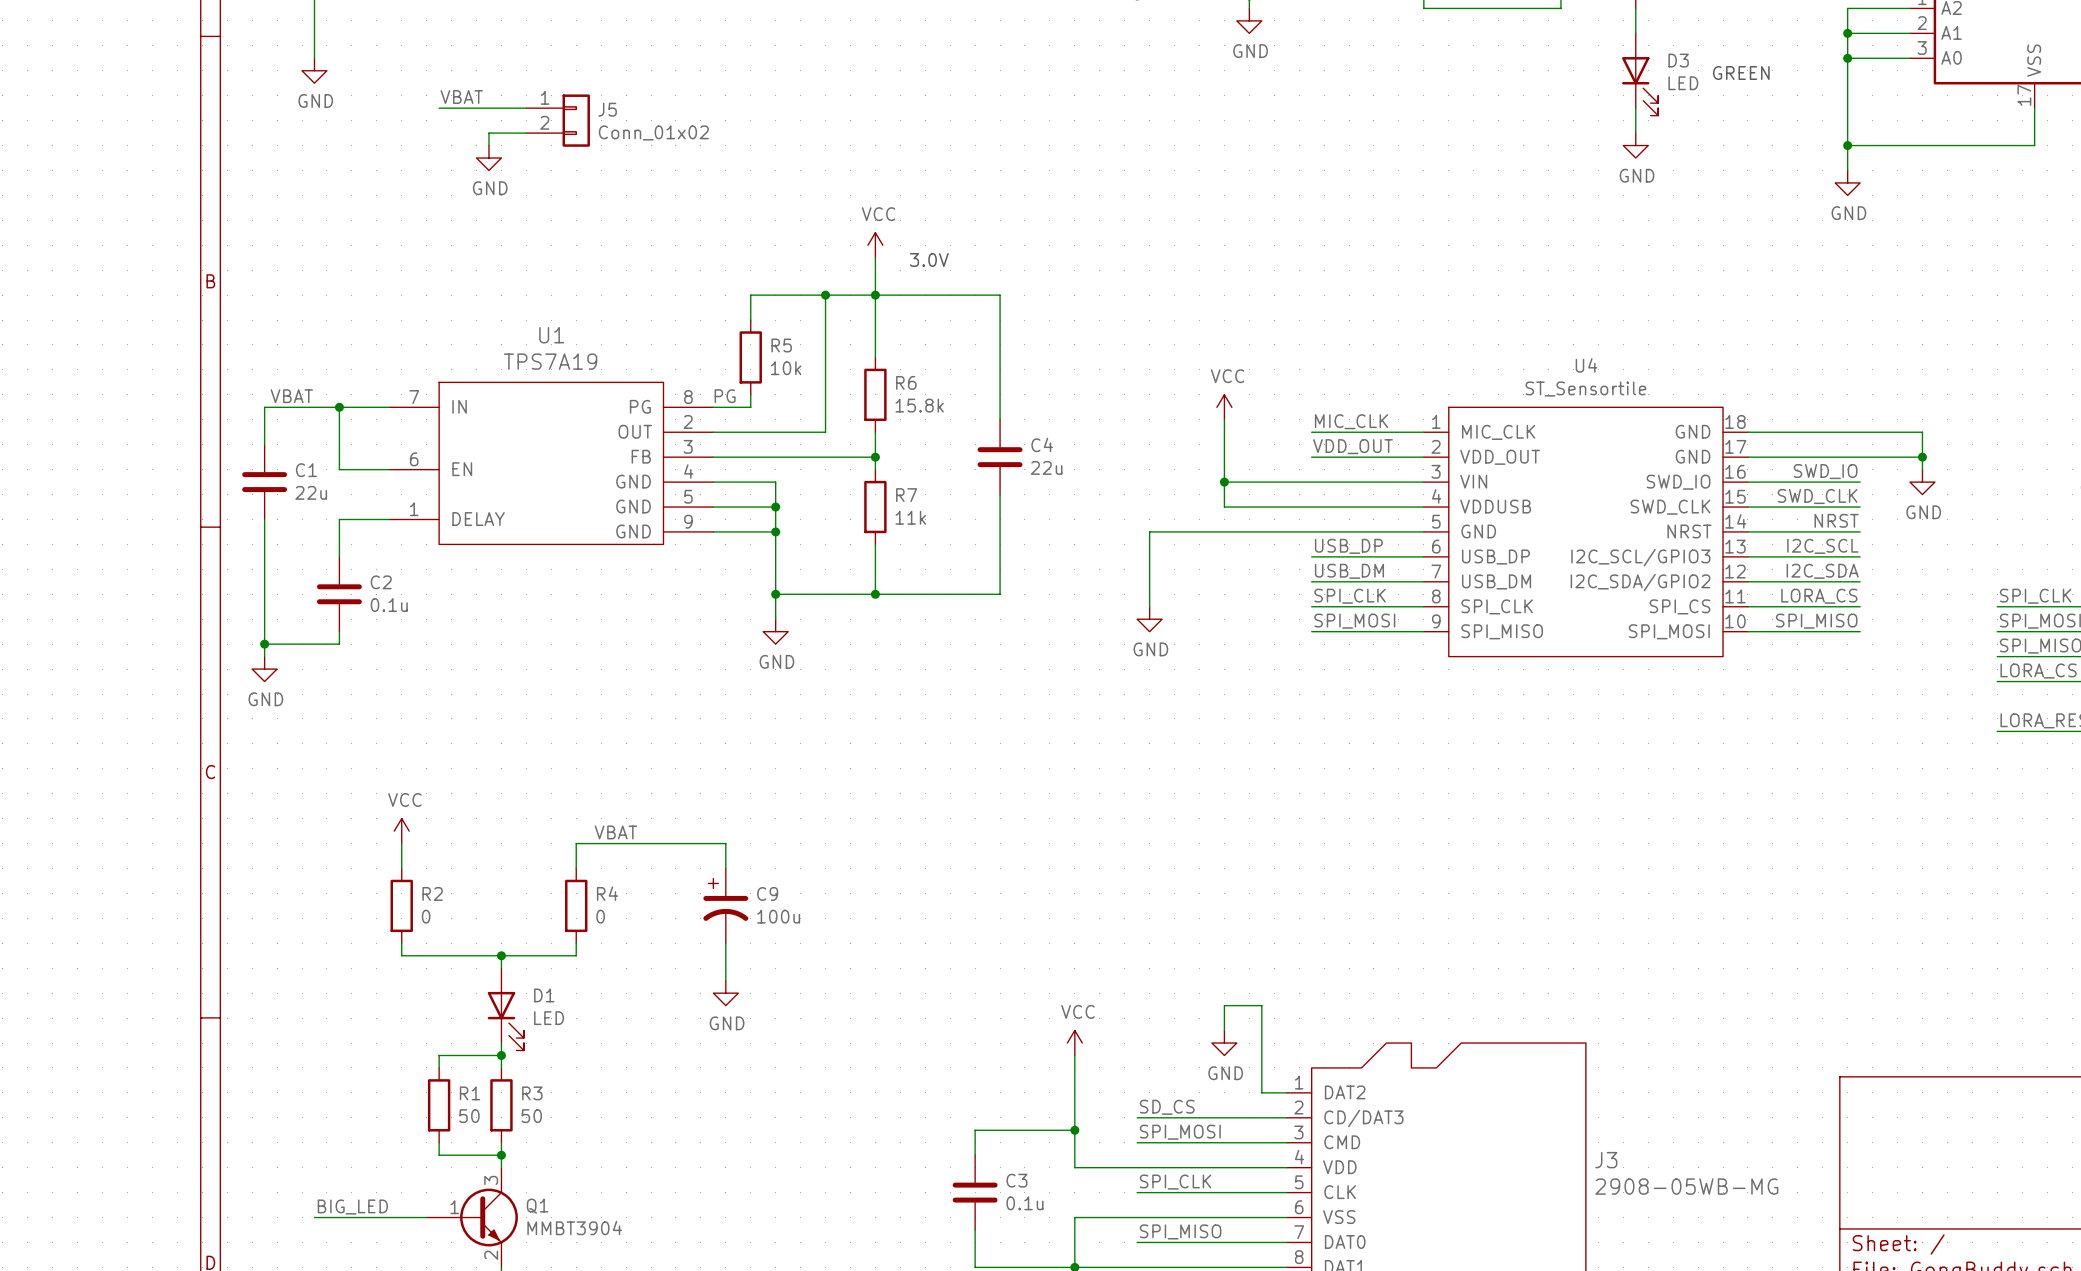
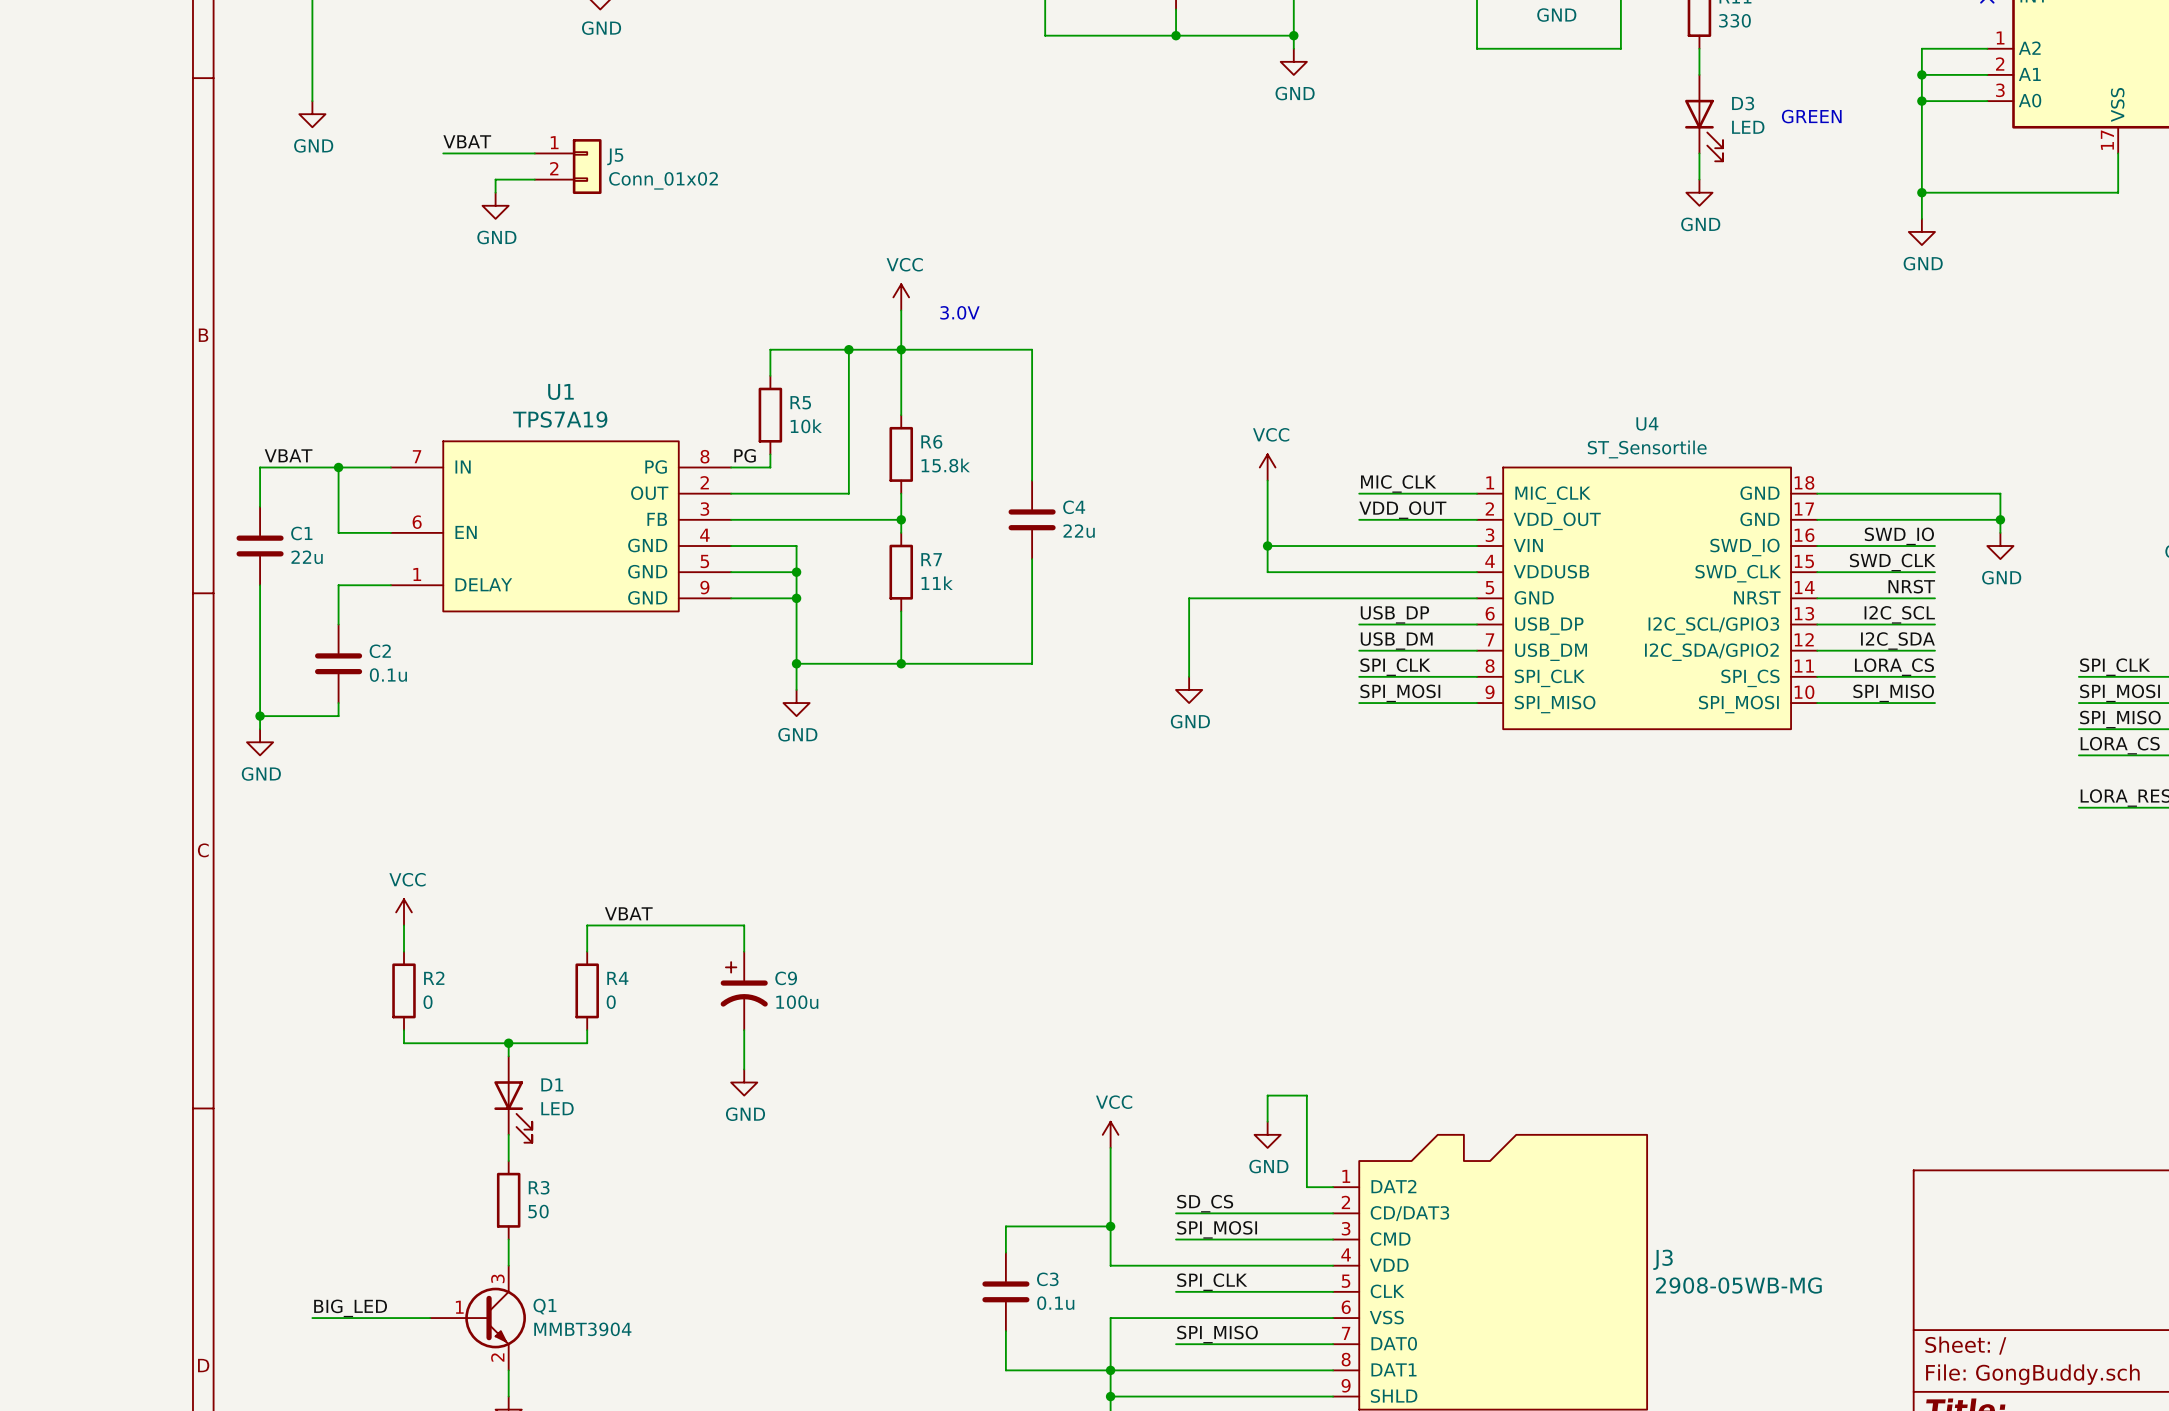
wire: (501, 1055) (439, 1055) (439, 1067) -> none
junction: (501, 1055) -> none
R1: 50 (439, 1105) -> none
wire: (439, 1142) (439, 1155) (501, 1155) -> none
junction: (501, 1155) -> none

